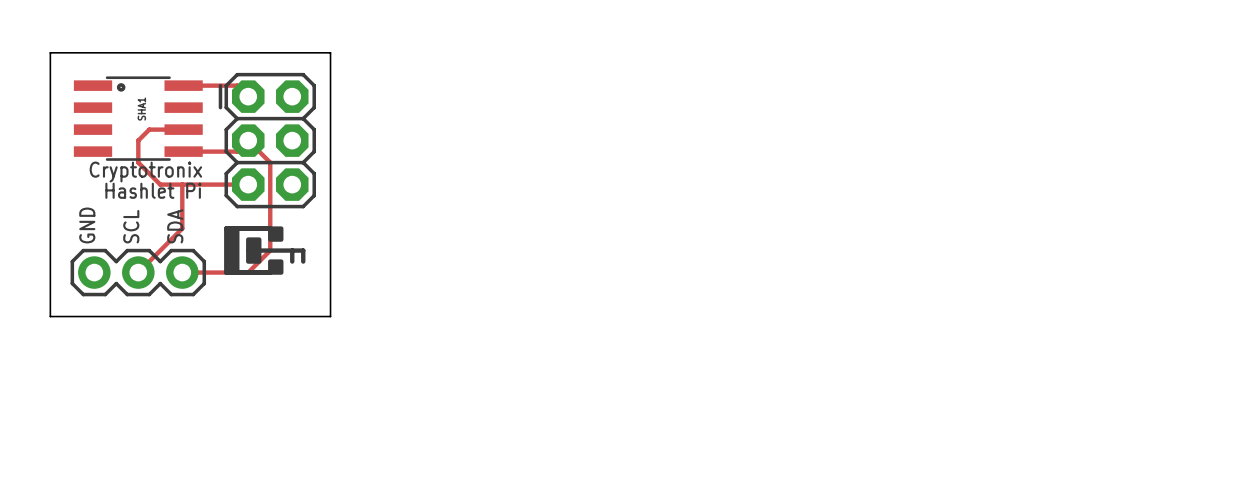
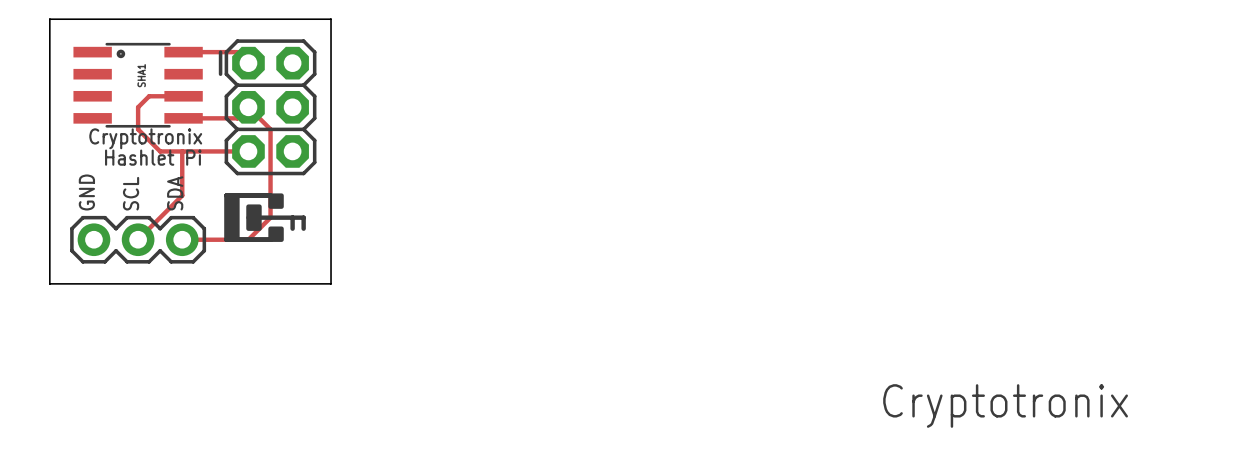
text: none -> Cryptotronix (1005, 406)

